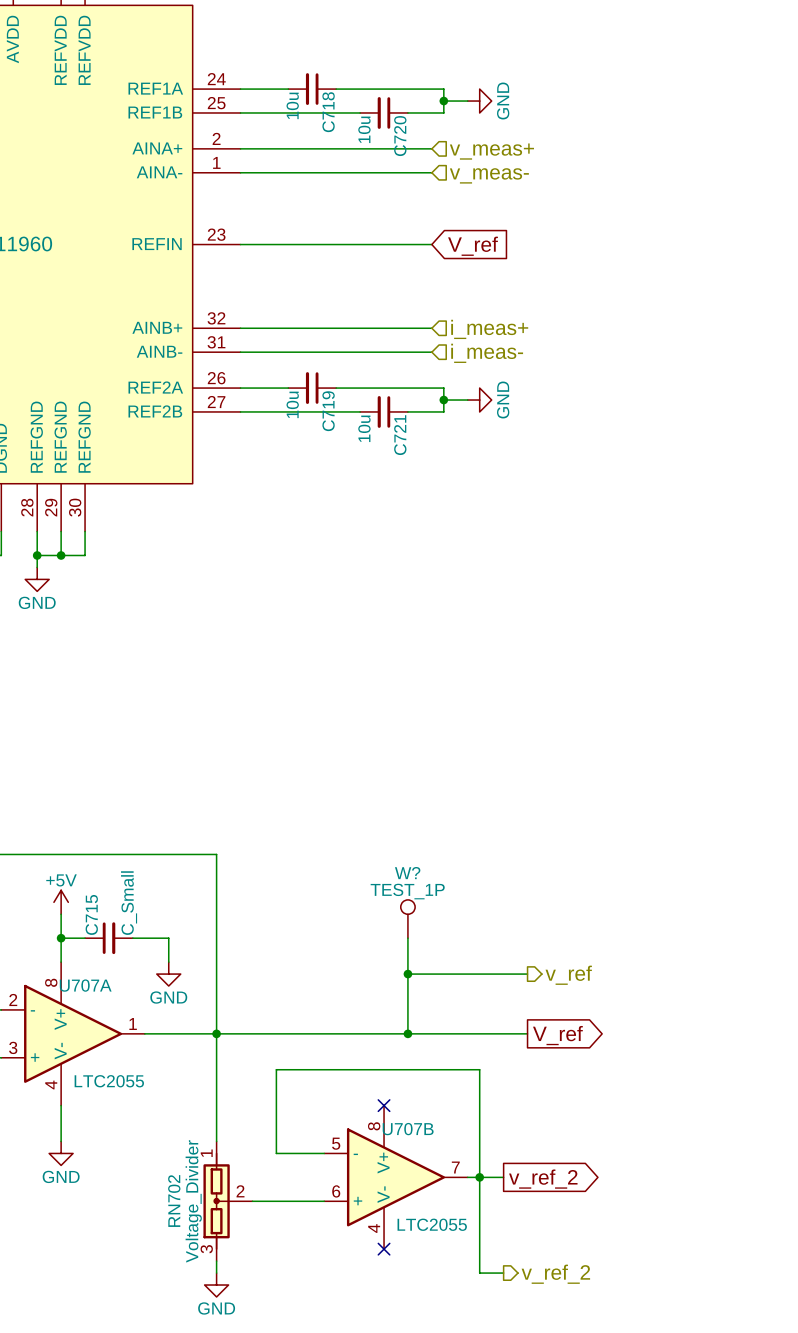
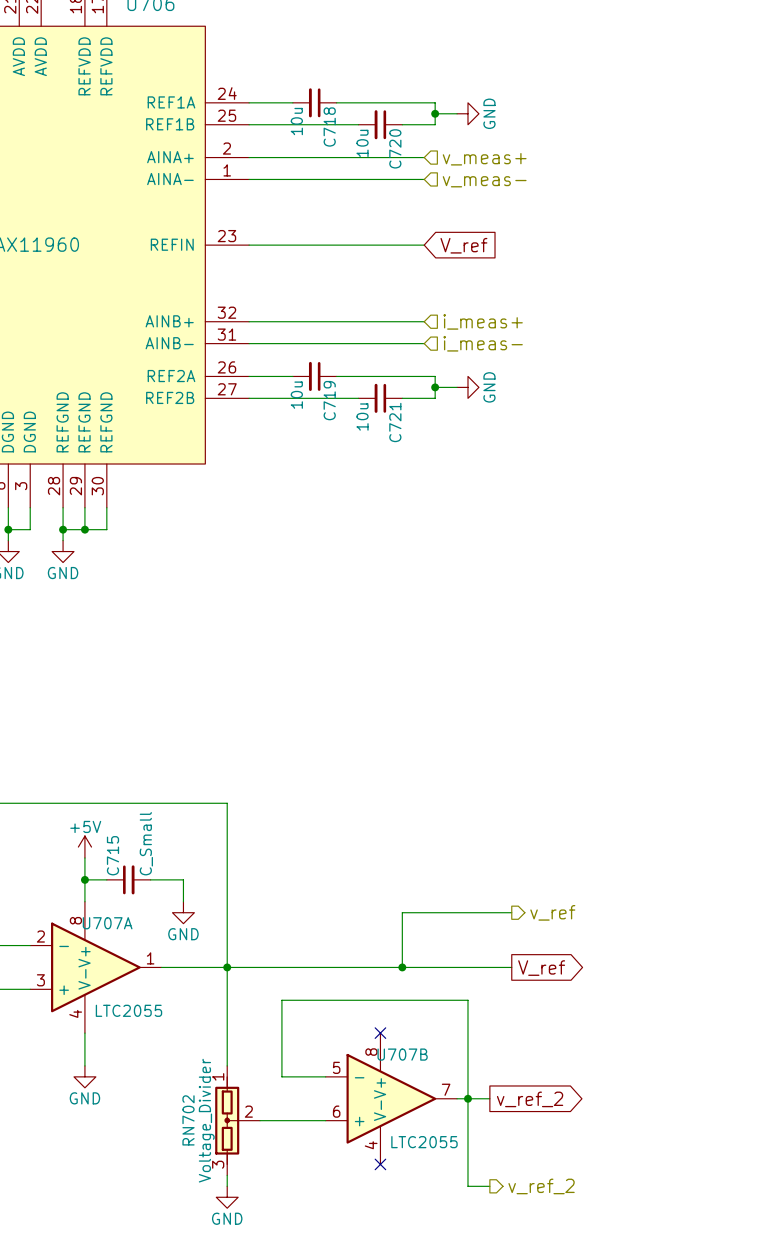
W?: TEST_1P (407, 919) -> none
wire: (407, 938) (407, 974) -> none
junction: (407, 974) -> none

